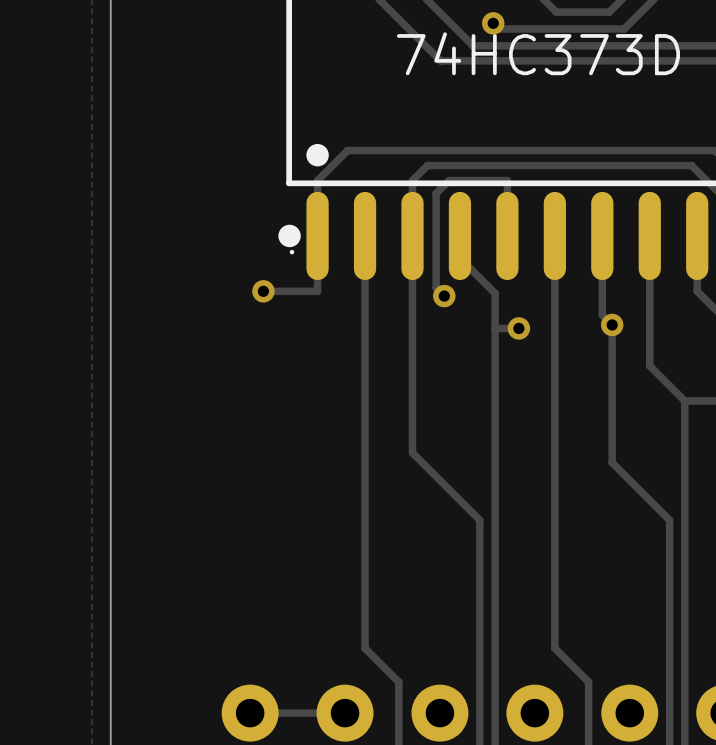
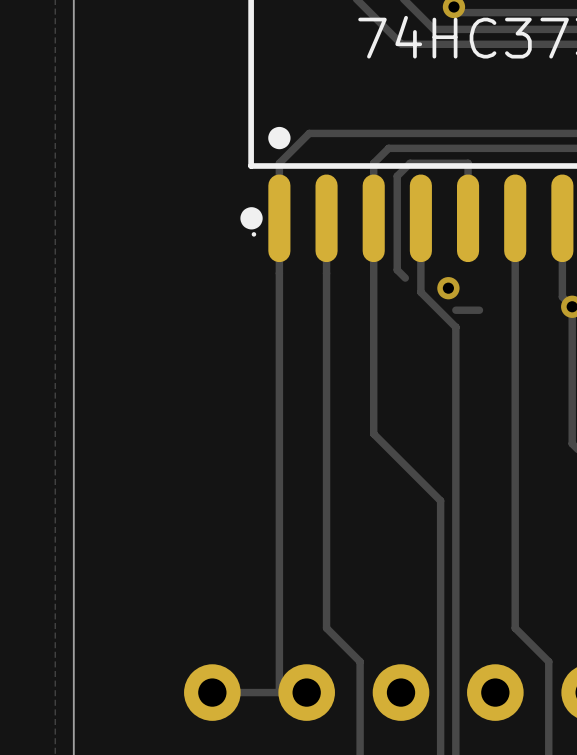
track: (459, 258) (495, 293) (495, 345) -> (420, 240) (420, 292) (455, 327)
track: (263, 291) (317, 291) -> (279, 692) (279, 273)
via: (263, 291) -> none
via: (444, 296) -> none
via: none -> (448, 288)
via: (518, 328) -> none

